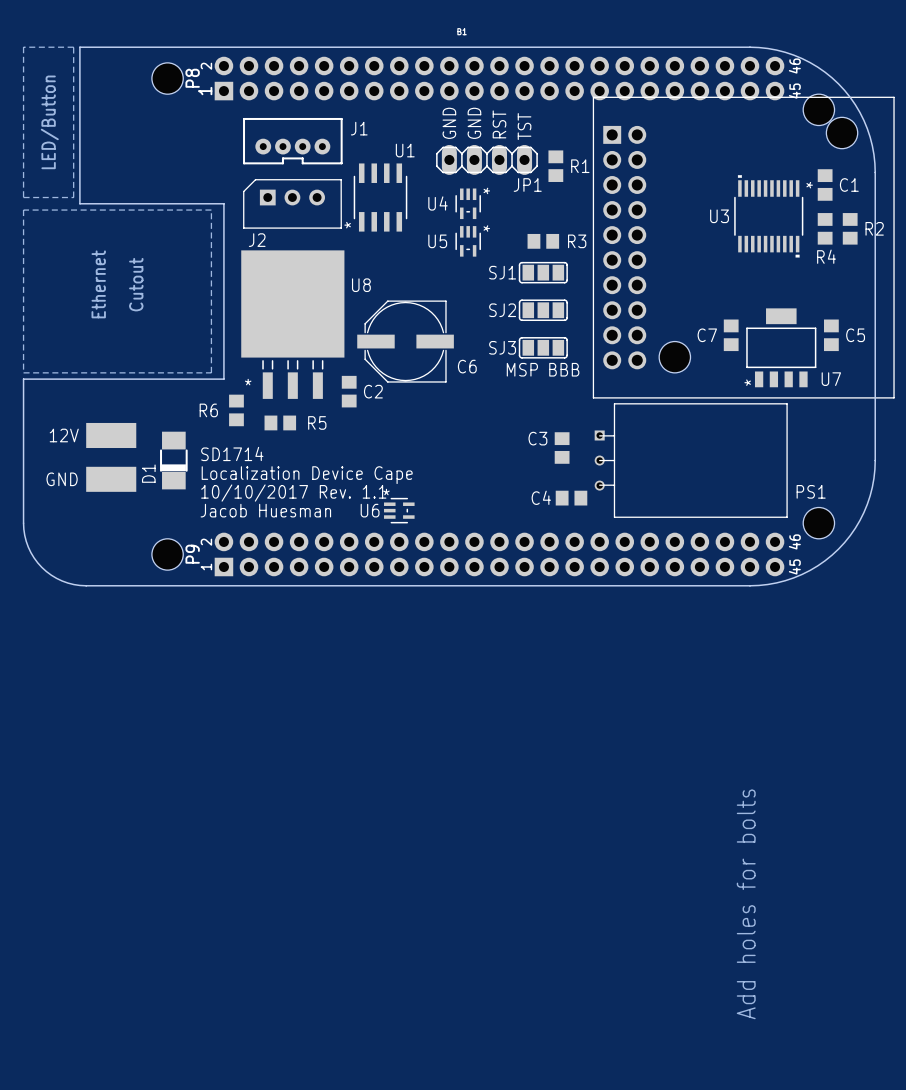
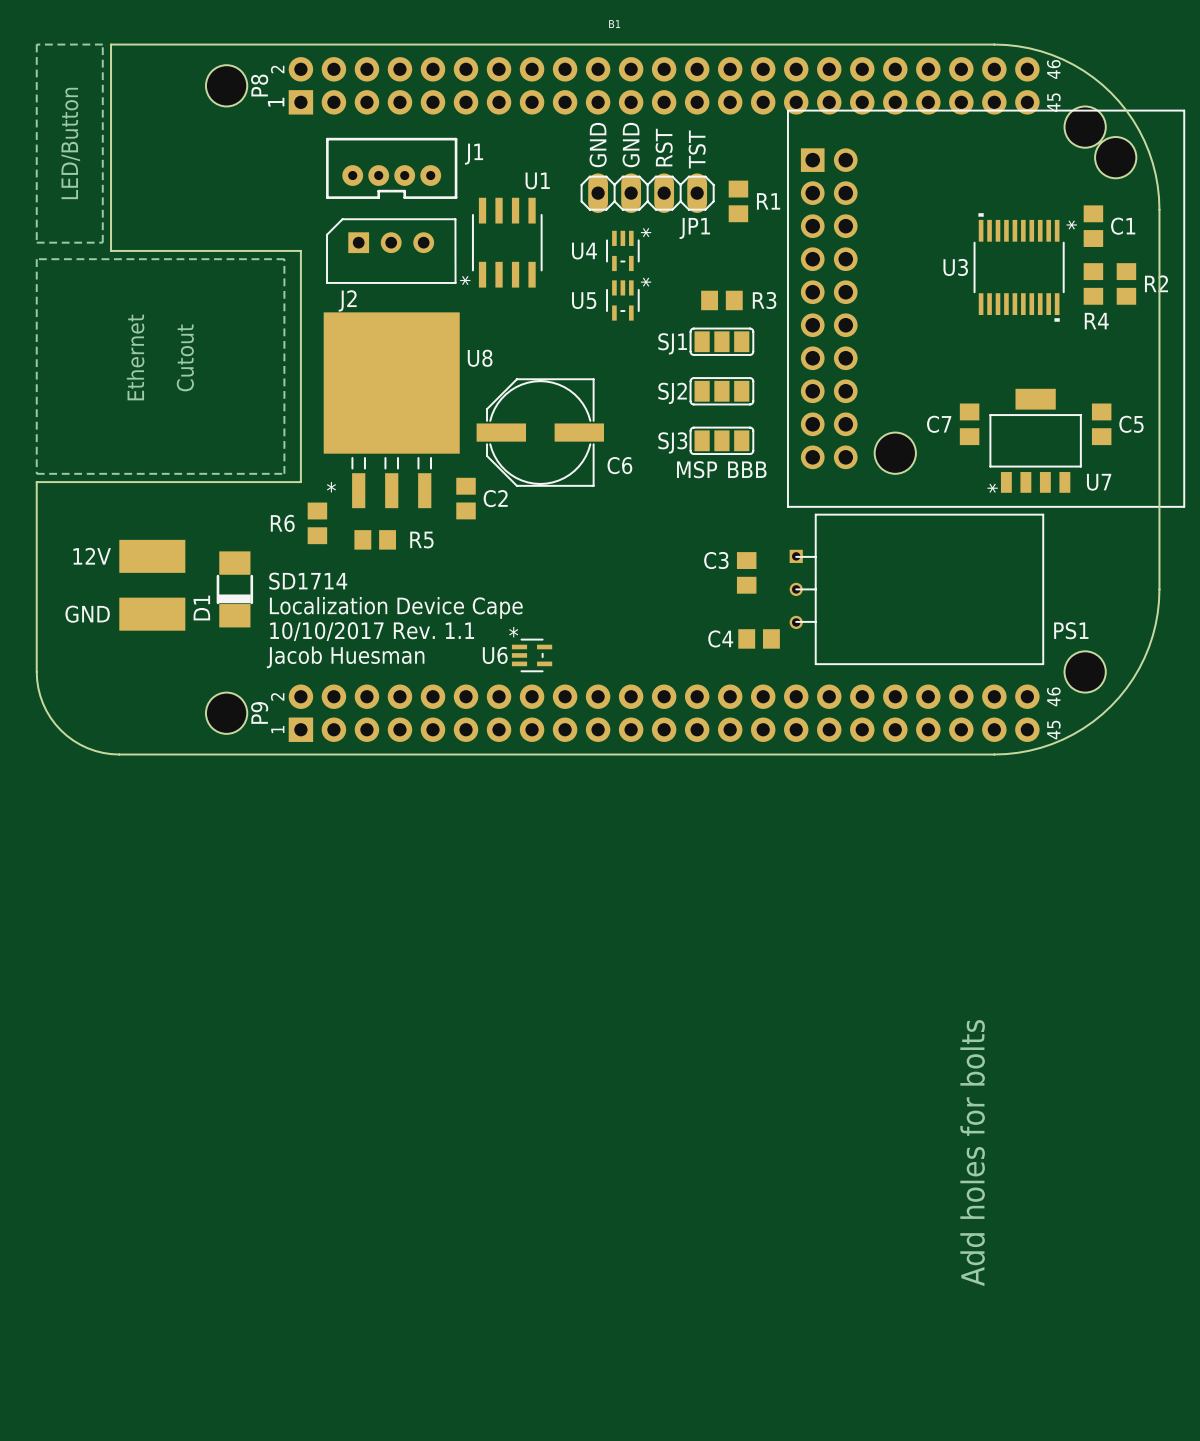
text position: Add holes for bolts (746, 904) -> Add holes for bolts (972, 1153)

